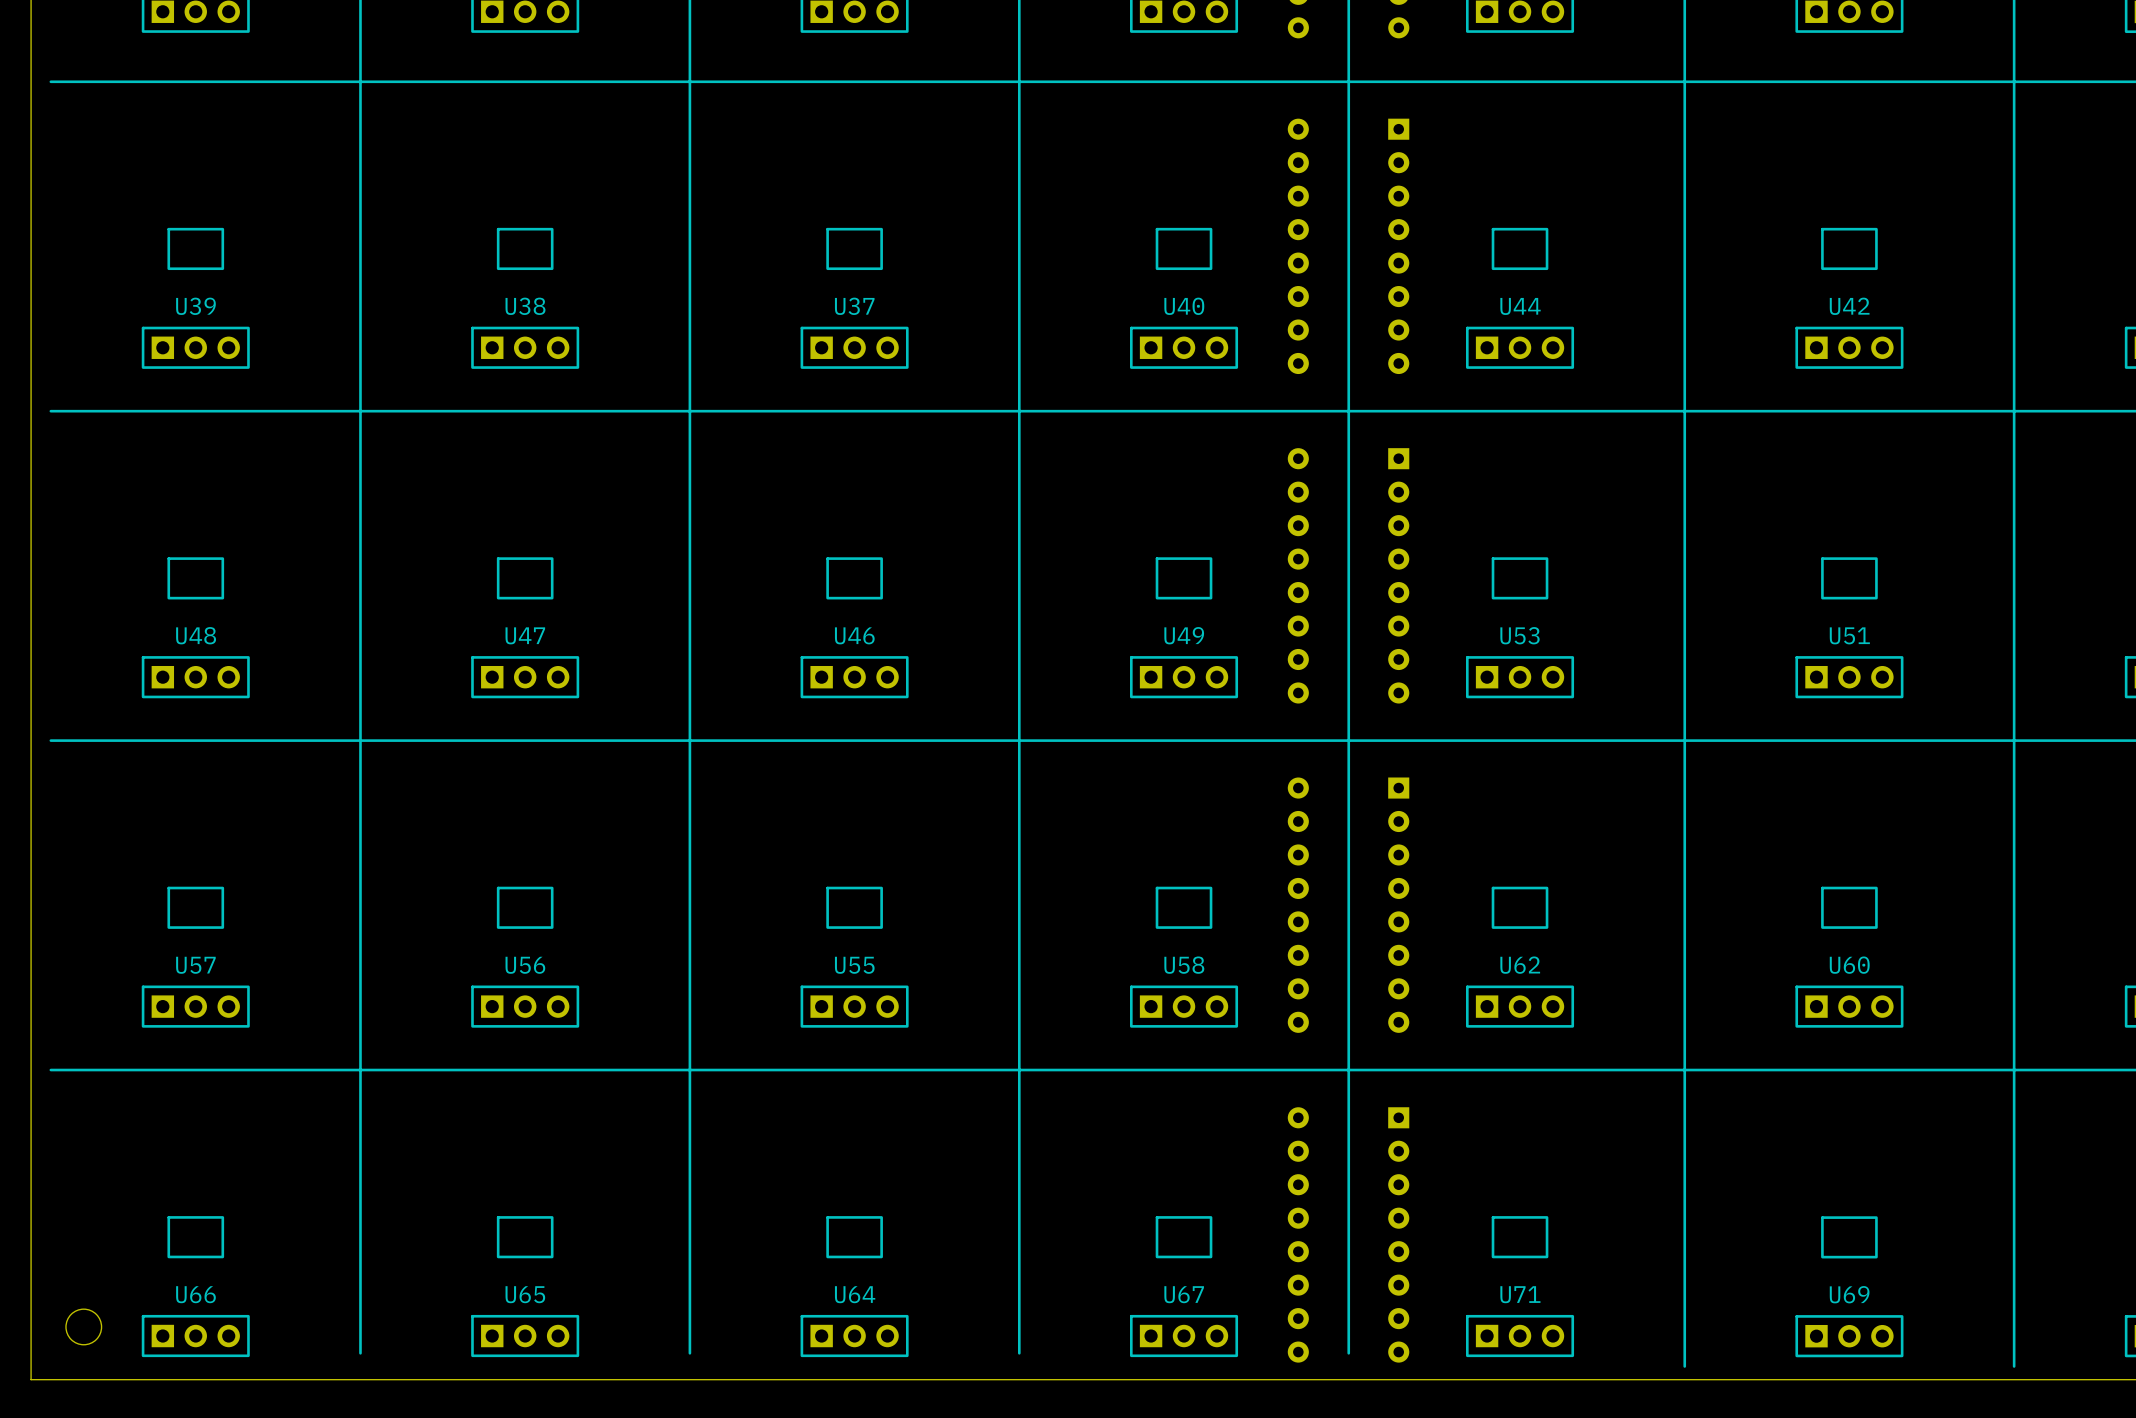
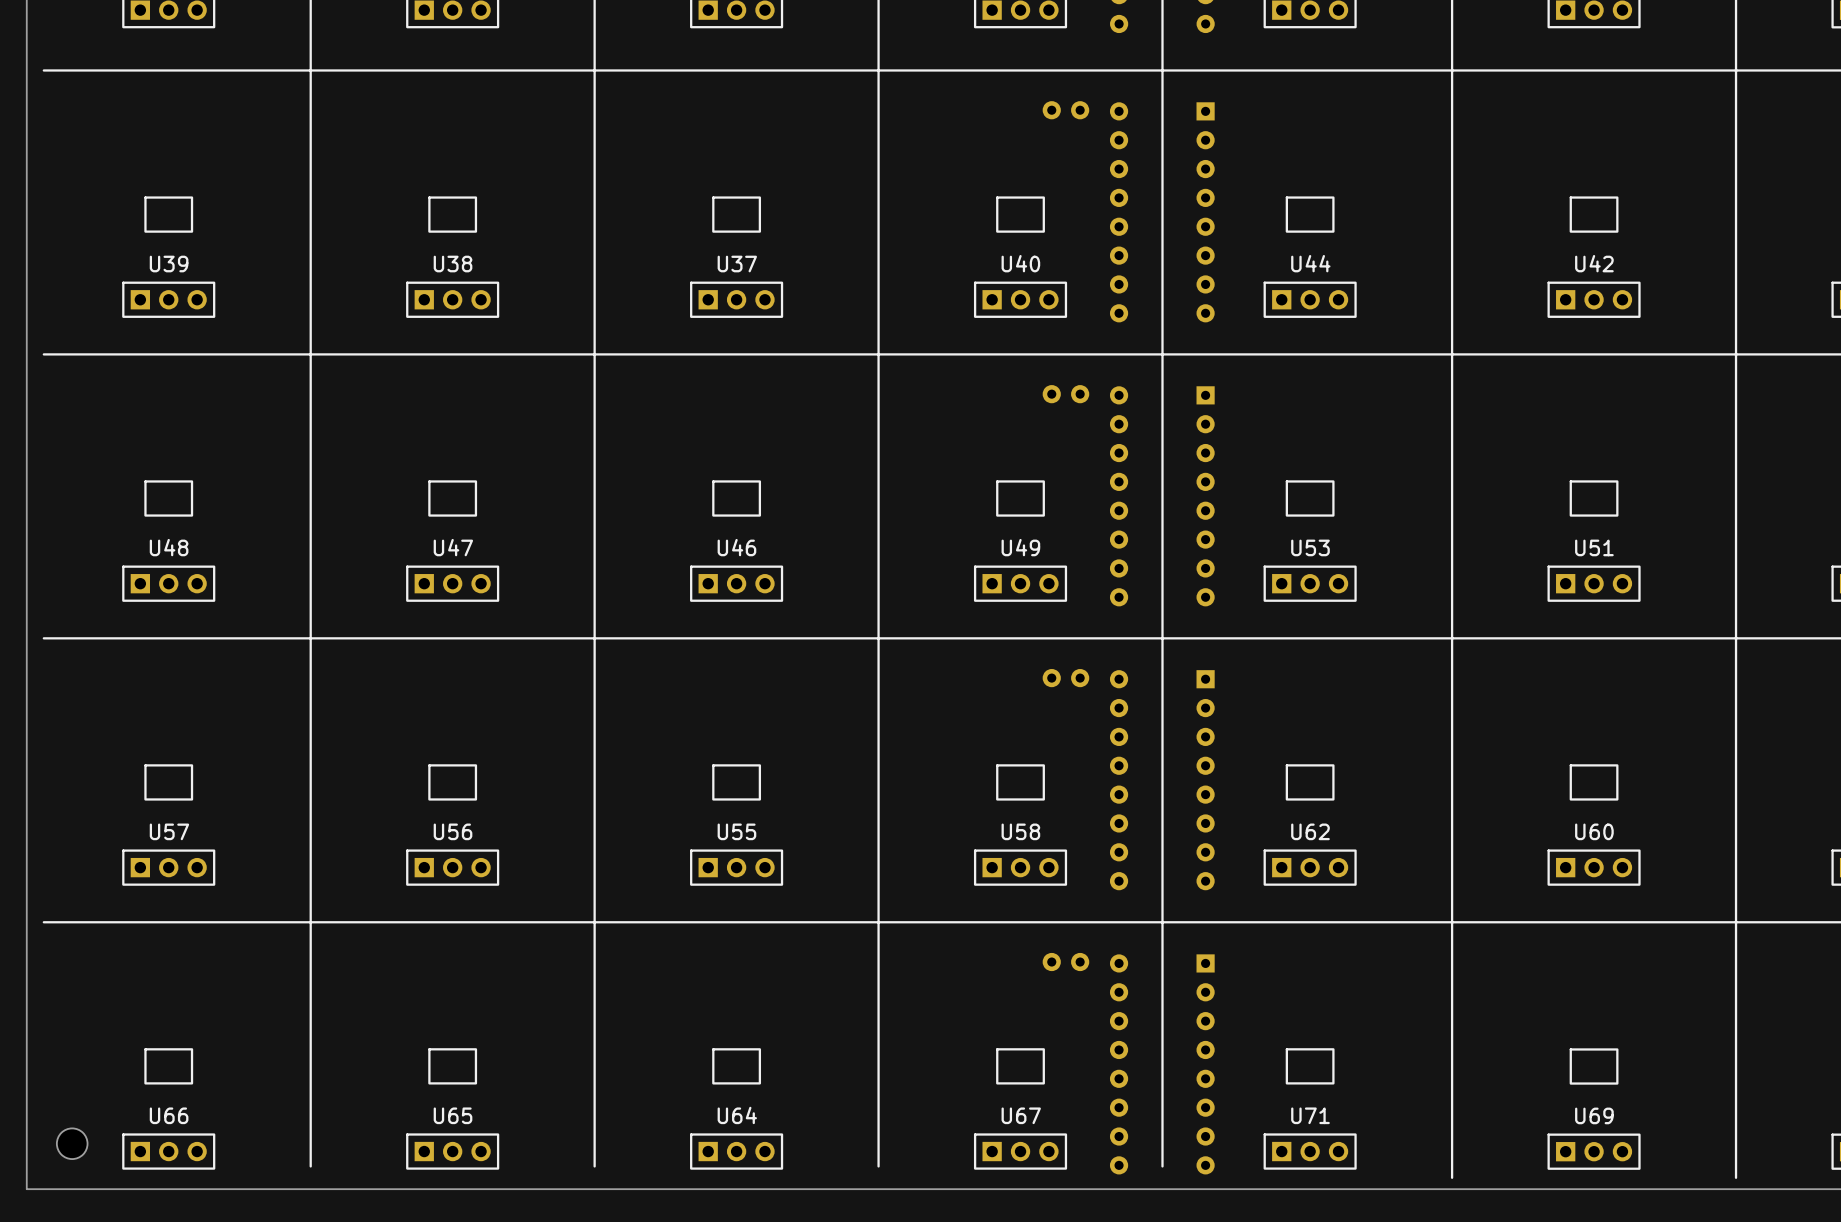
part: none -> (1065, 110)
part: none -> (1065, 394)
part: none -> (1065, 678)
part: none -> (1065, 962)

